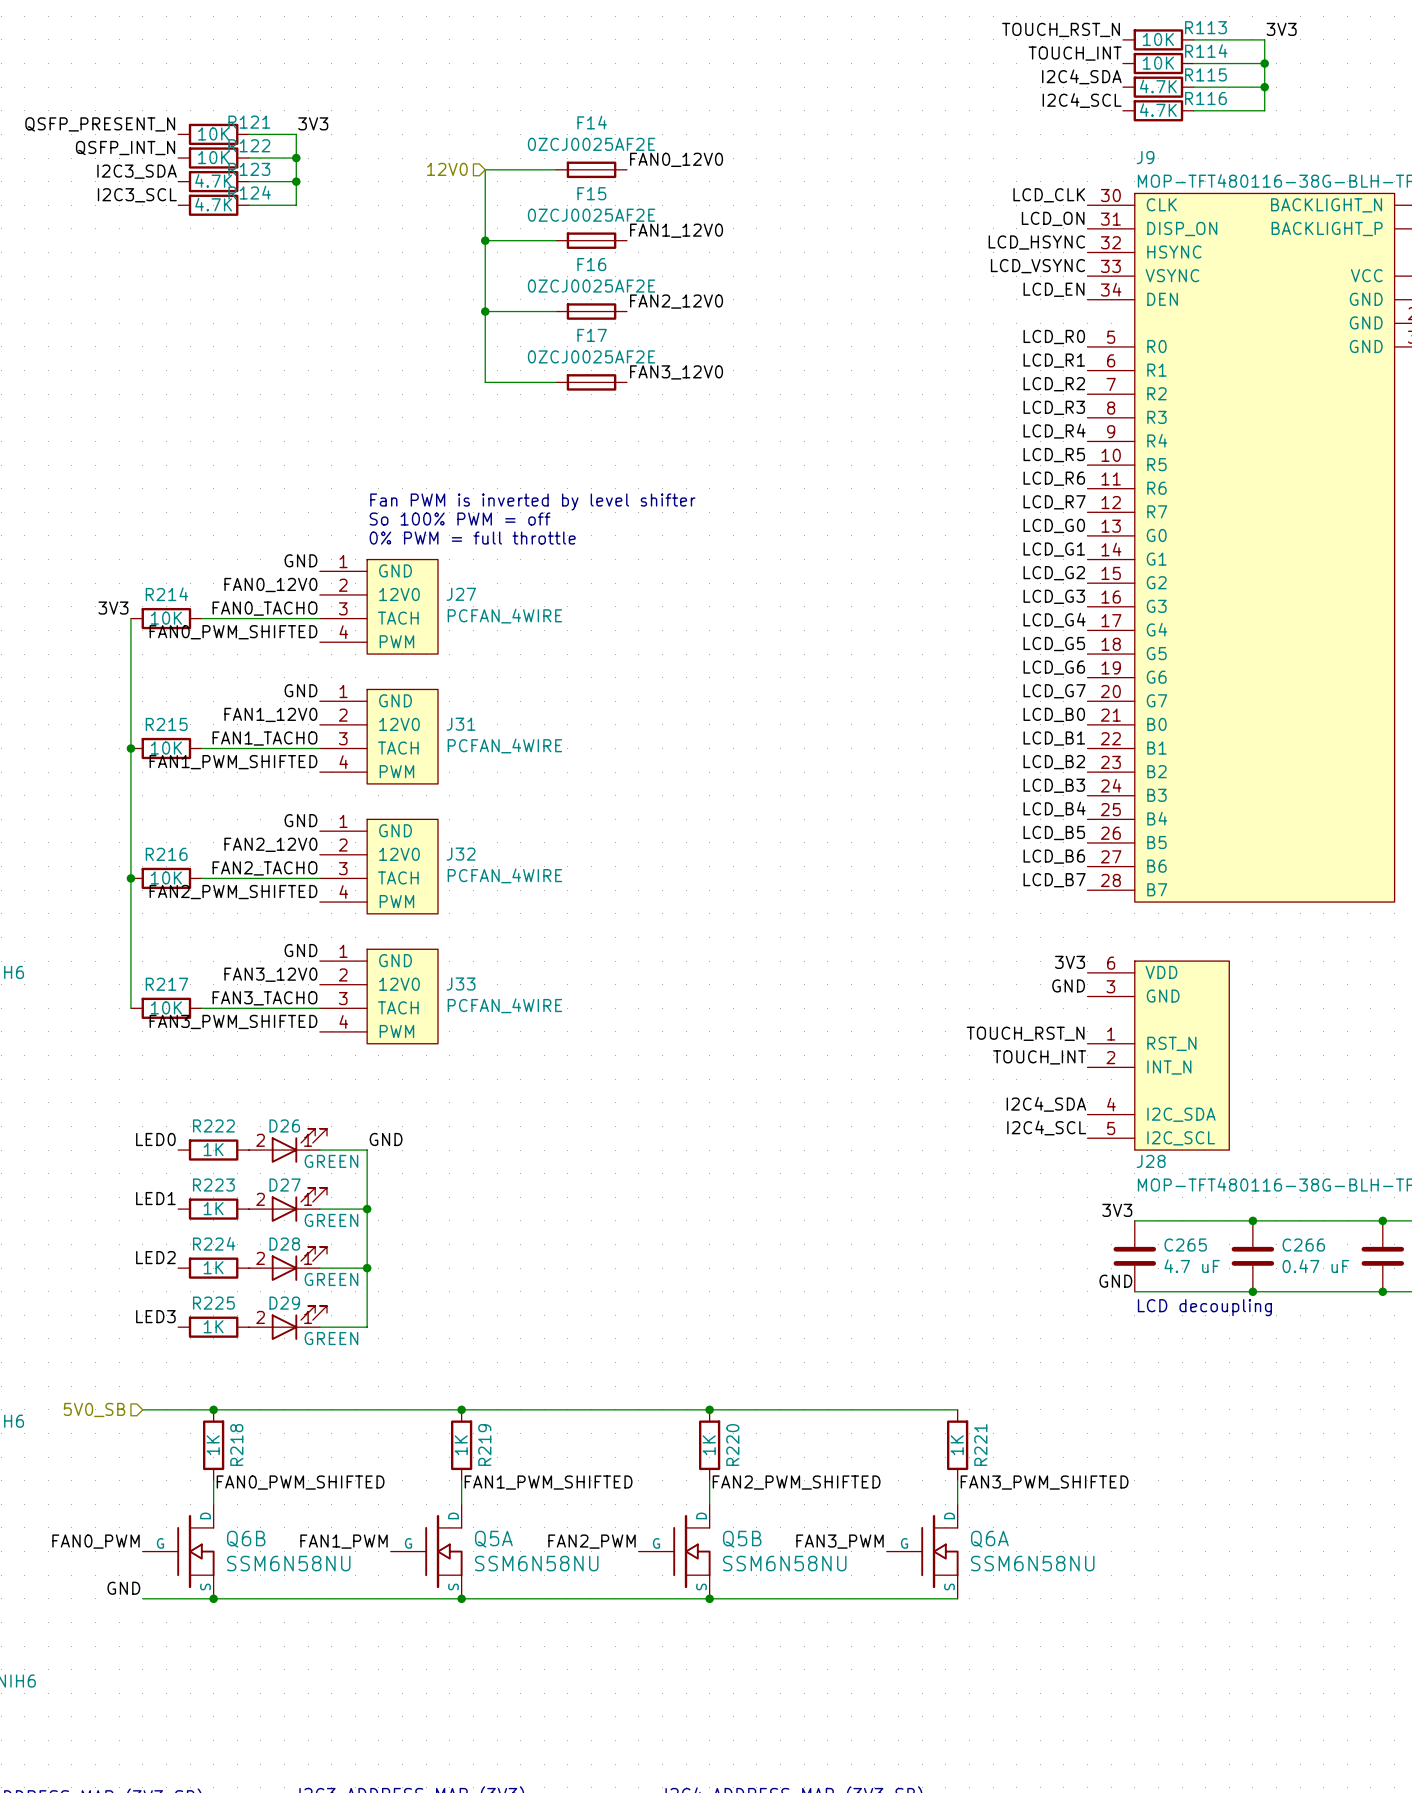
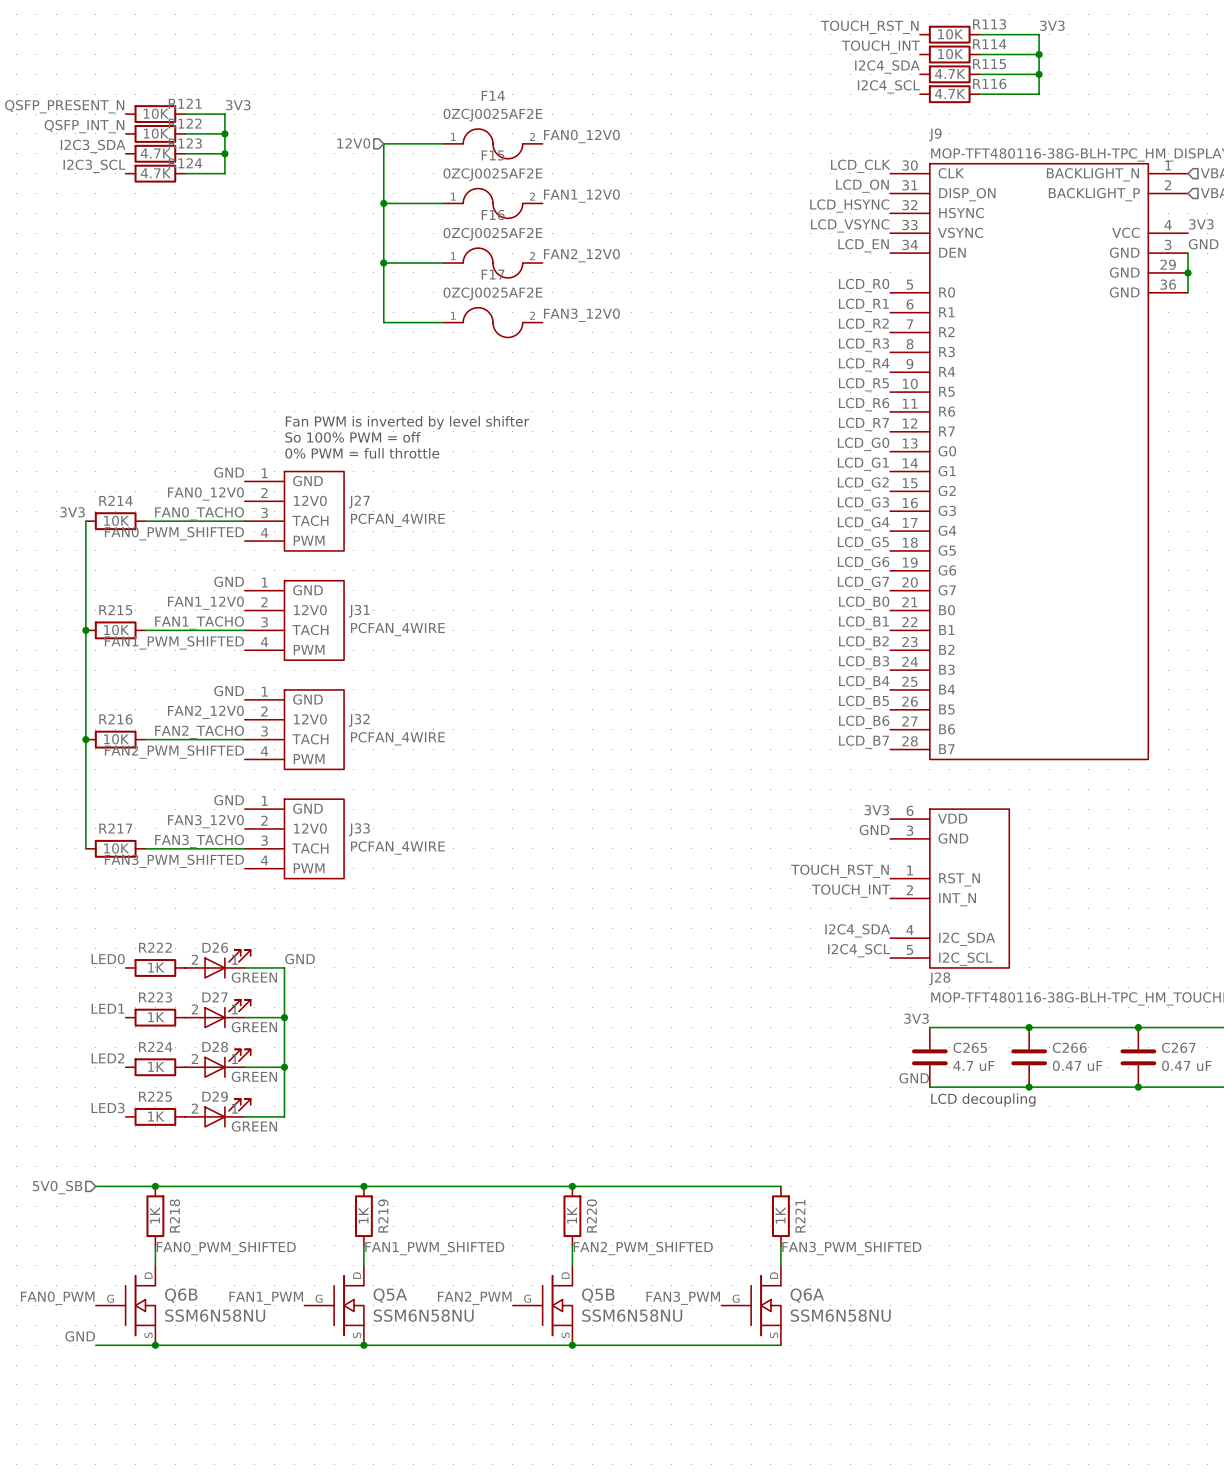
label position: FAN0_12V0 (676, 159) -> FAN0_12V0 (581, 136)
F14 symbol: [556, 161, 627, 179] -> [443, 128, 543, 159]
label position: FAN1_12V0 (676, 230) -> FAN1_12V0 (581, 196)
F15 symbol: [556, 232, 627, 249] -> [443, 188, 543, 219]
label position: FAN2_12V0 (676, 301) -> FAN2_12V0 (581, 255)
F16 symbol: [556, 303, 627, 320] -> [443, 248, 543, 278]
label position: FAN3_12V0 (676, 372) -> FAN3_12V0 (581, 315)
F17 symbol: [556, 374, 627, 391] -> [443, 307, 543, 338]

